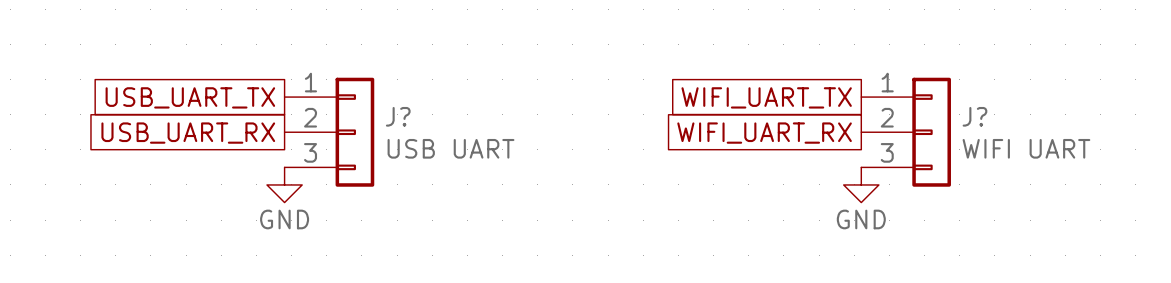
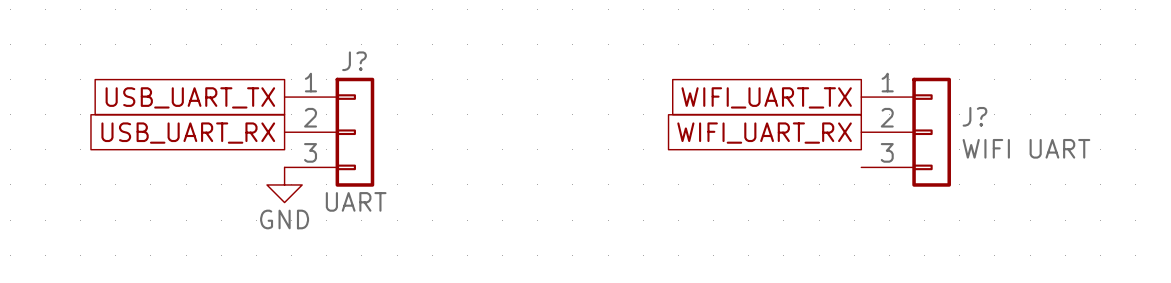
J? name position: J? (398, 116) -> J? (354, 61)
J? value: USB UART (451, 148) -> UART (356, 201)
power symbol: GND (861, 184) -> none

